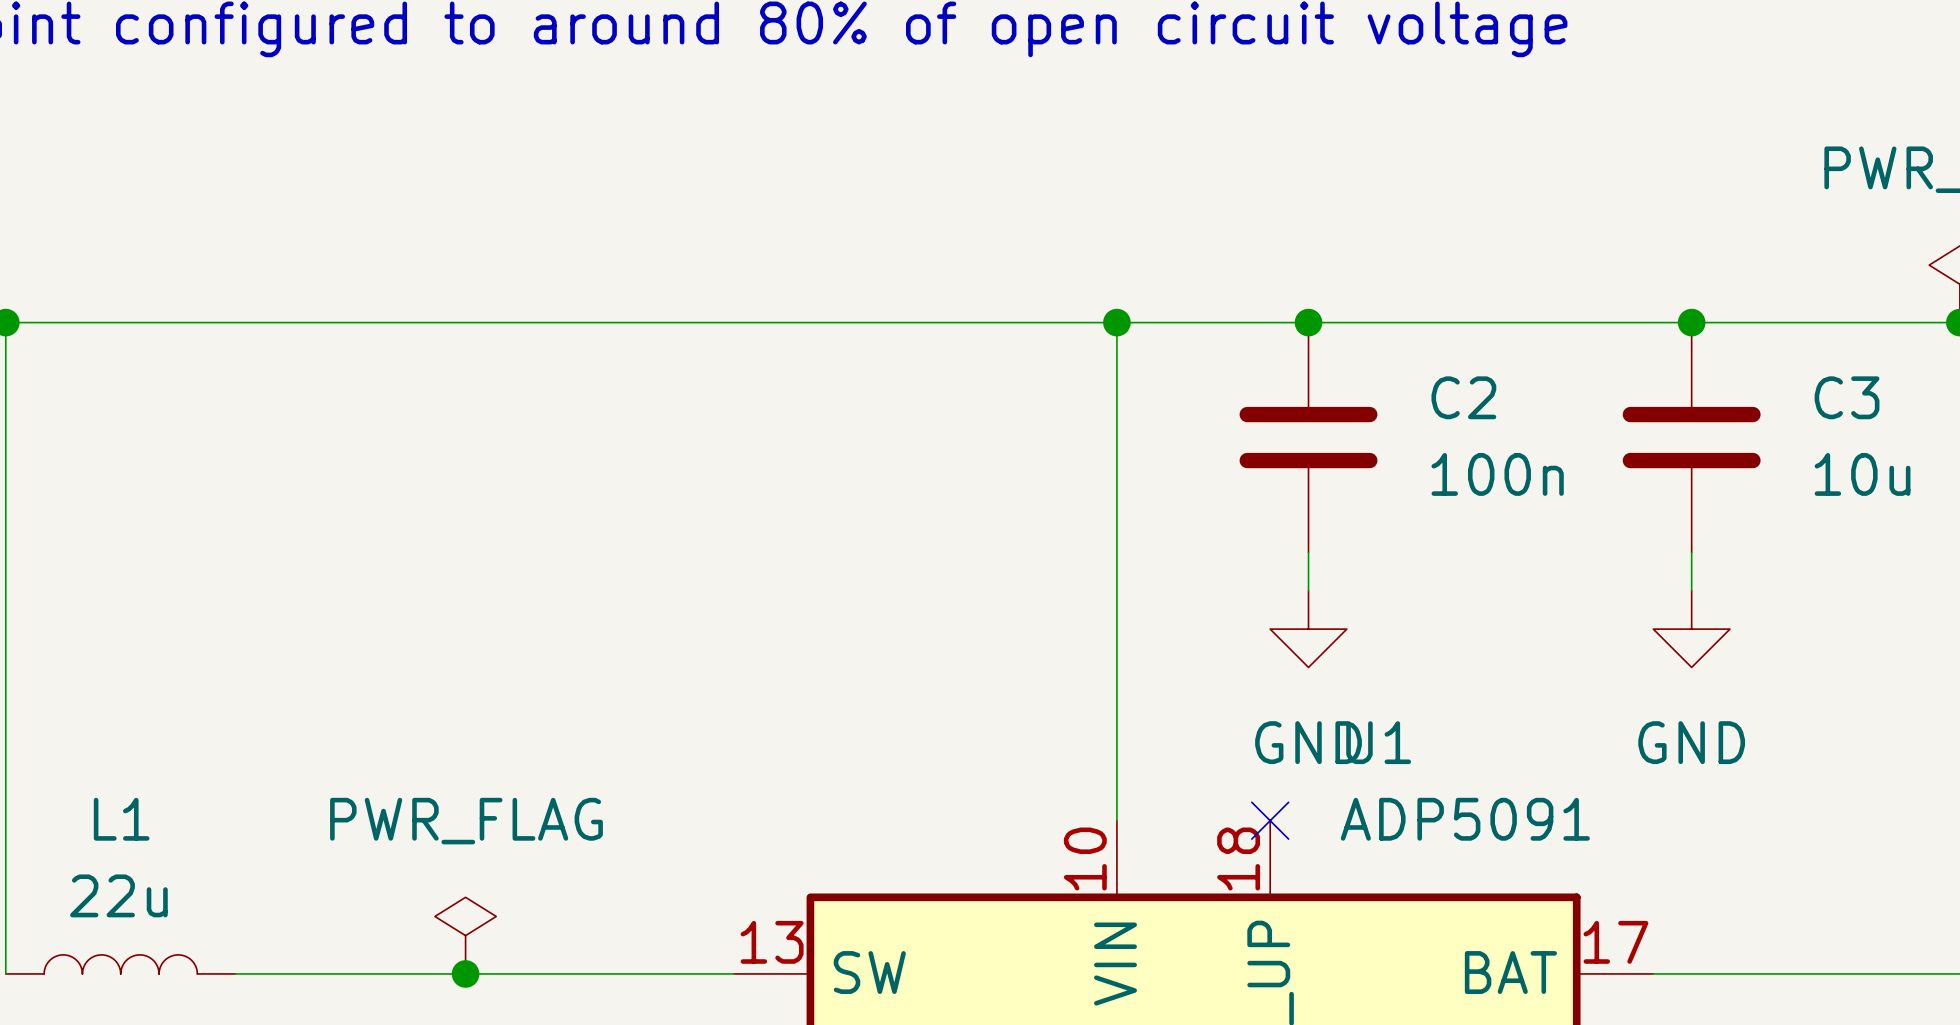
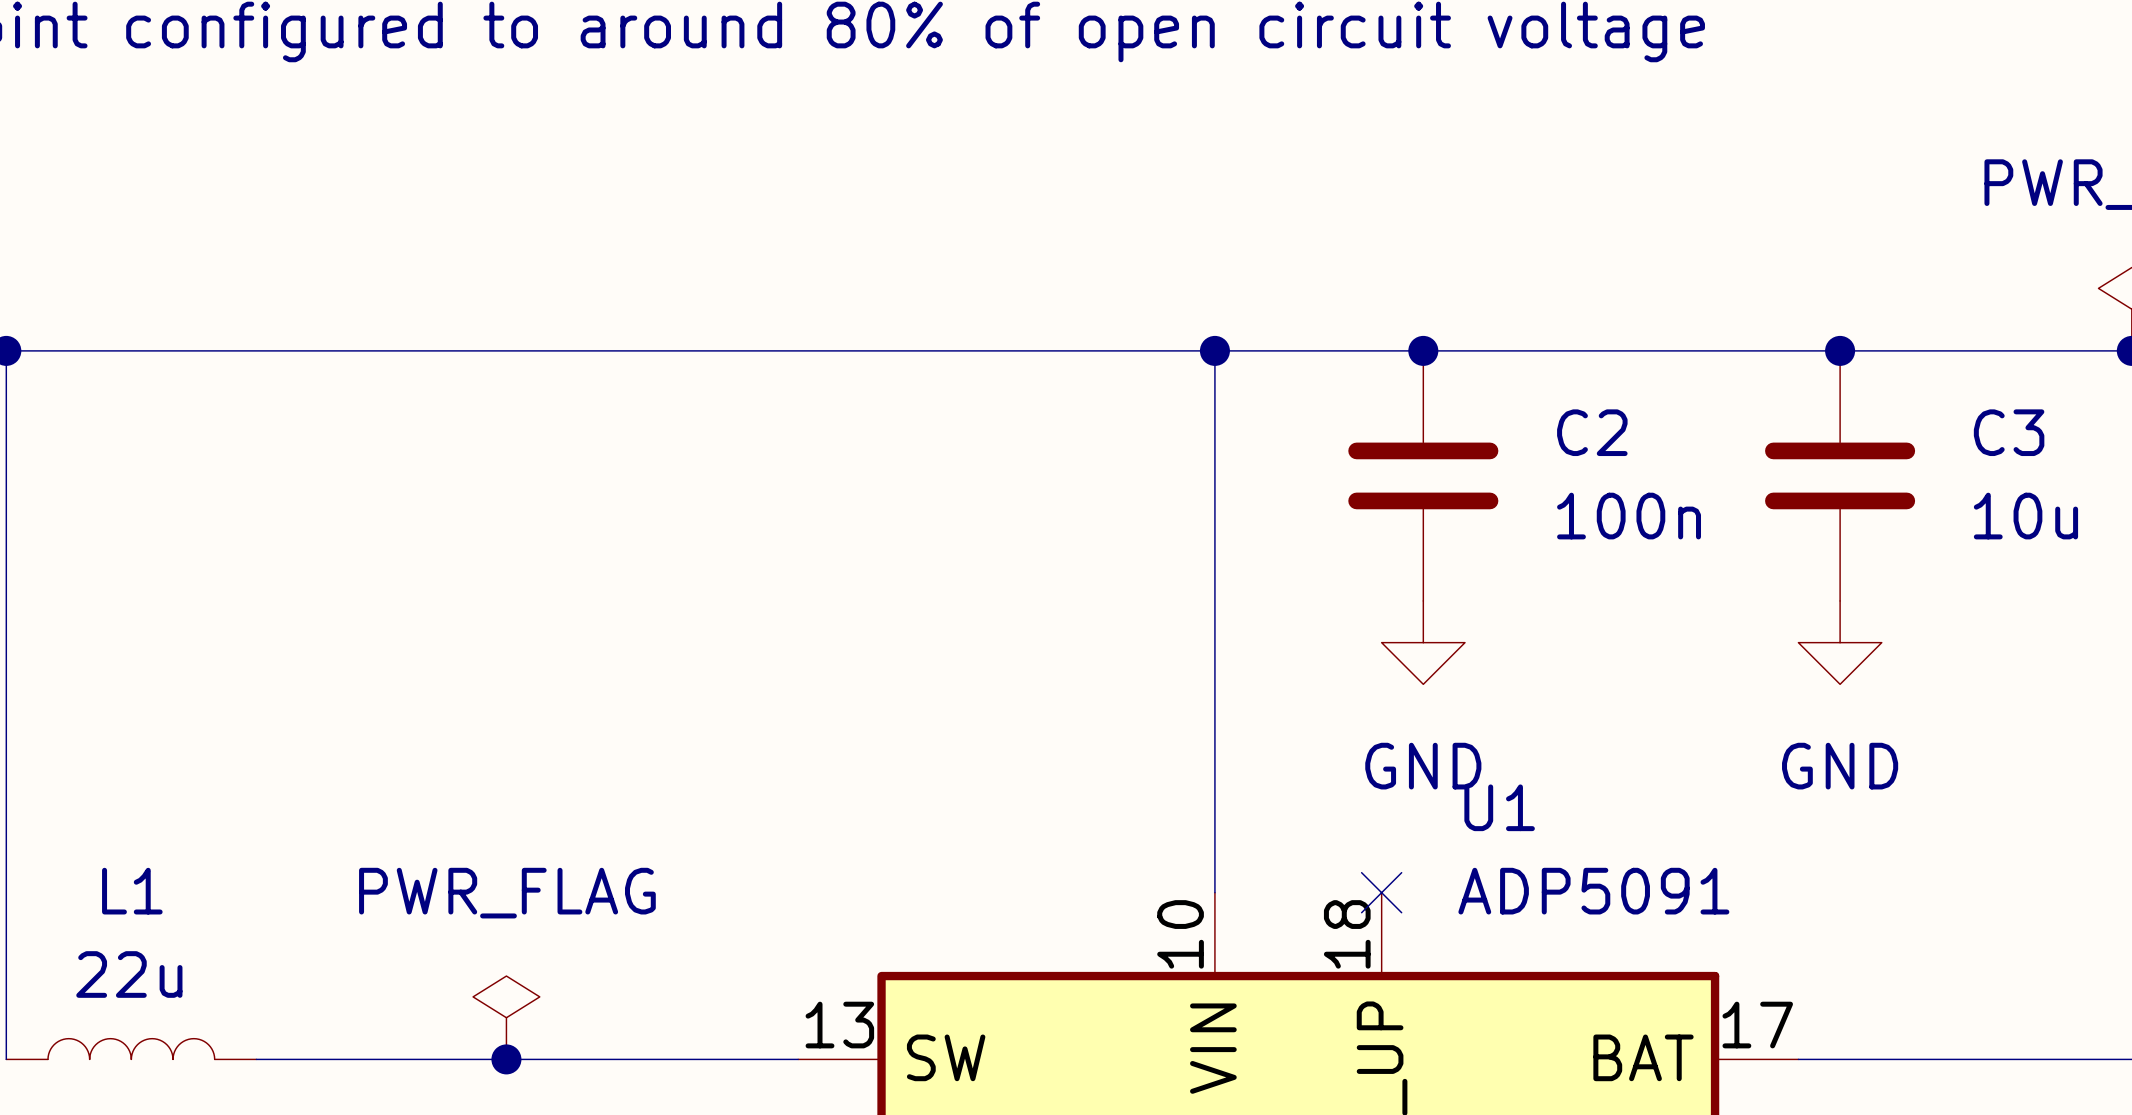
power symbol position: GND (1308, 629) -> GND (1423, 642)
power symbol position: GND (1691, 629) -> GND (1840, 642)

